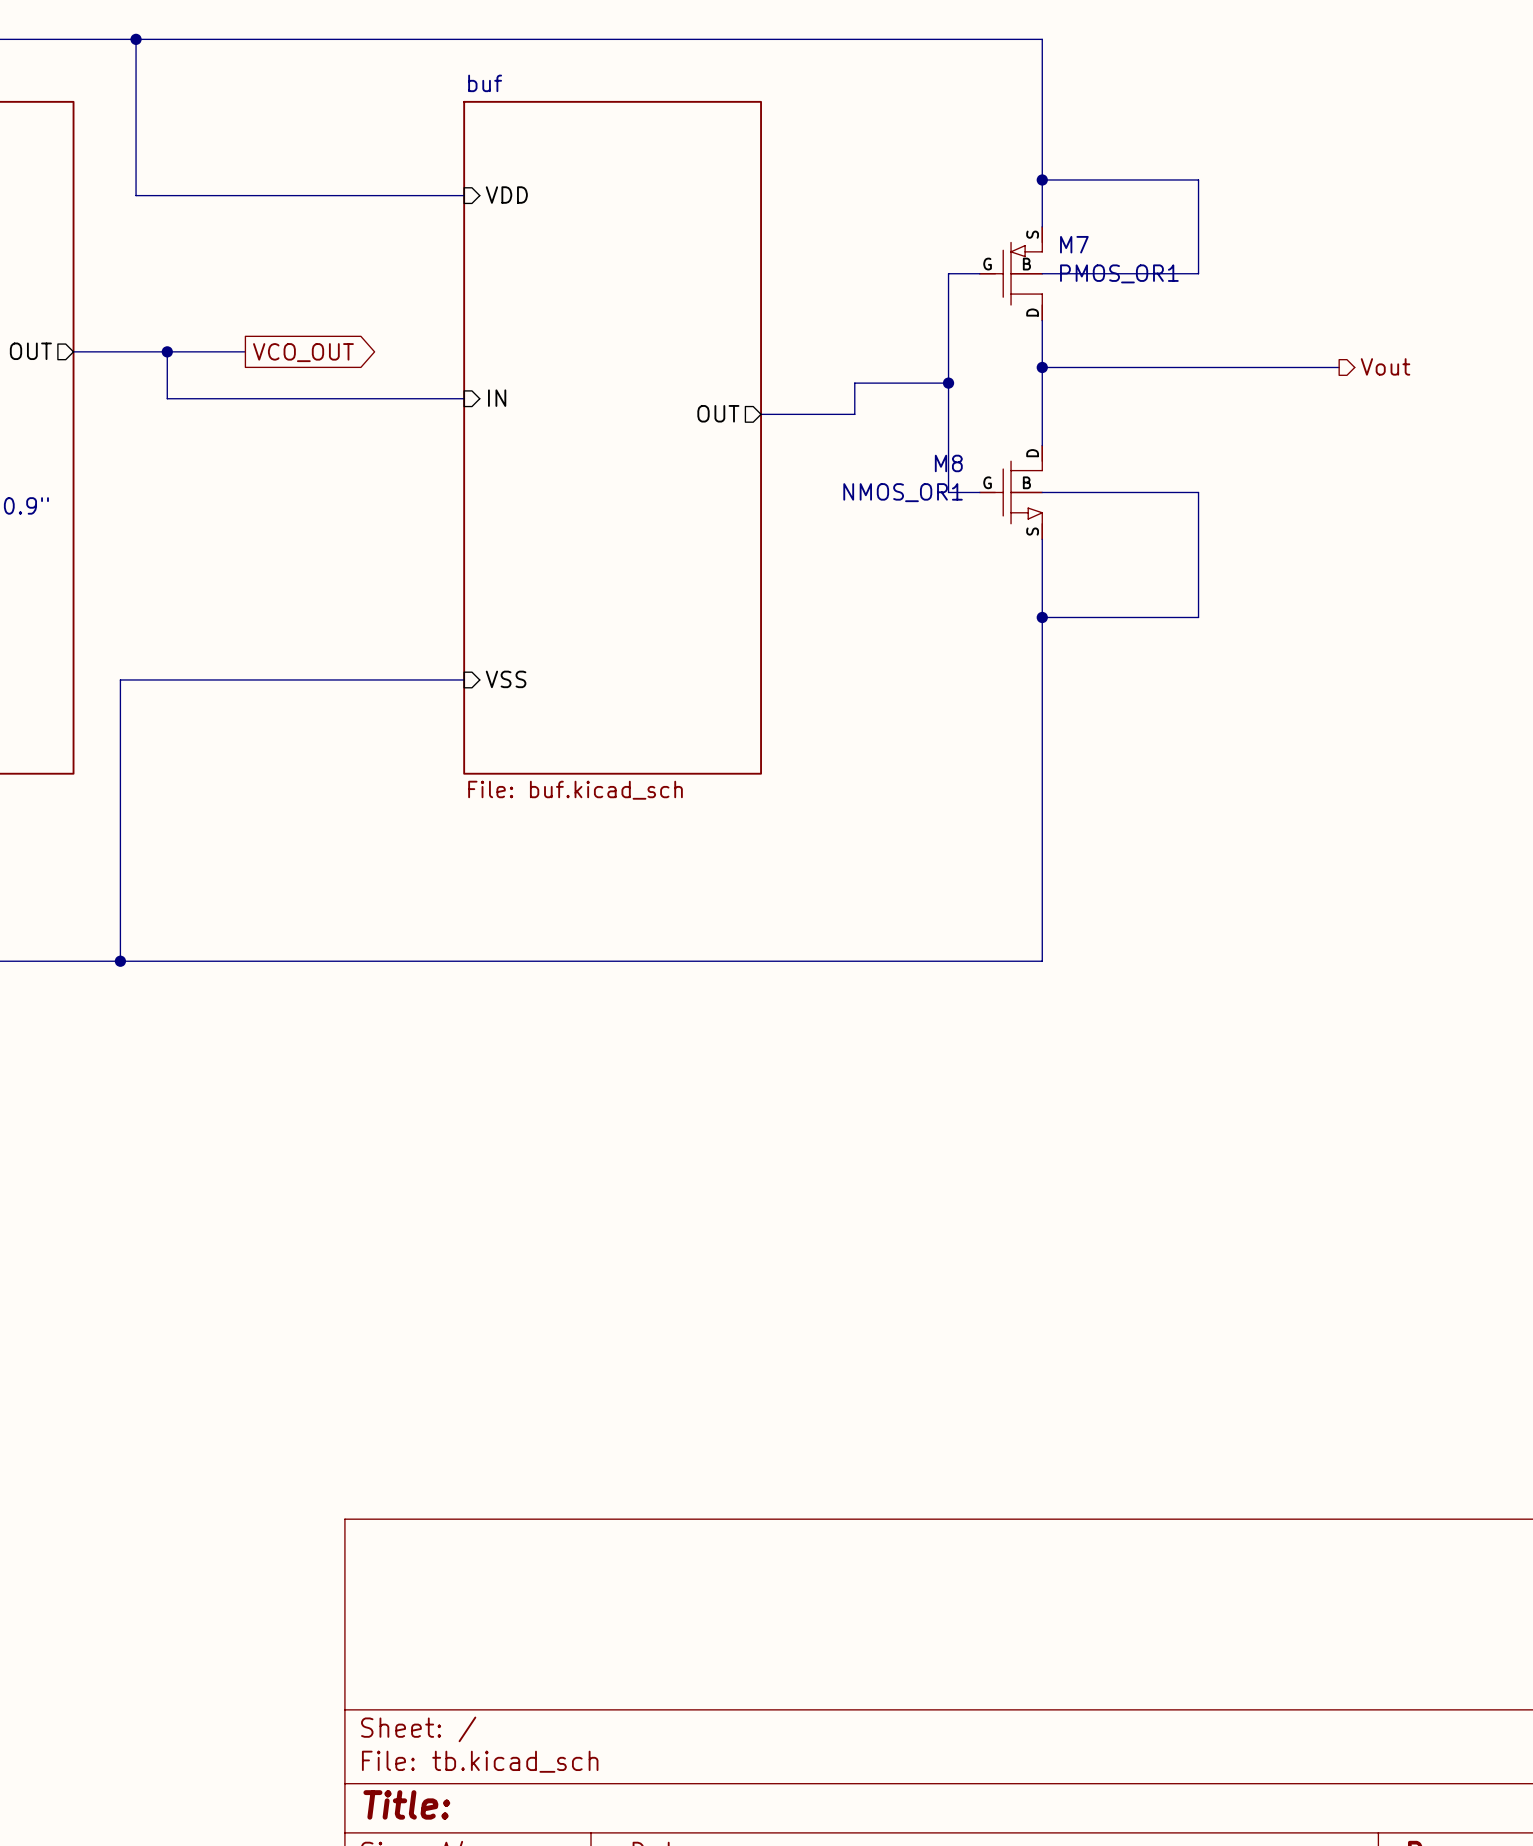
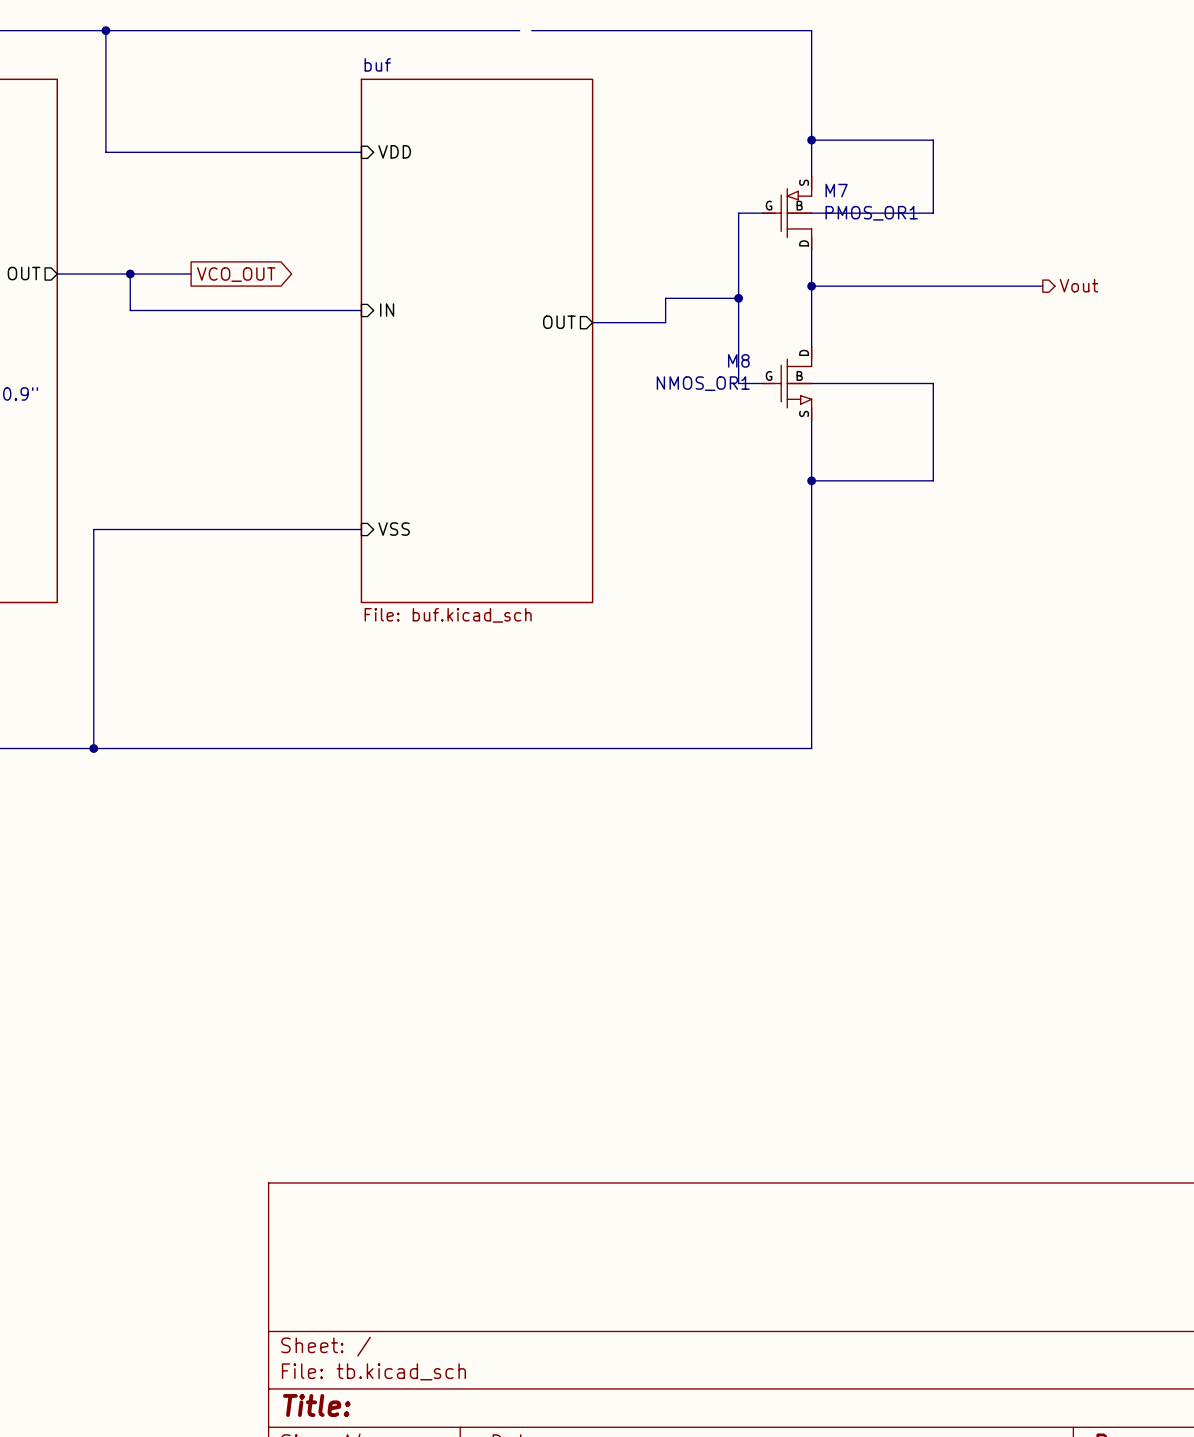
wire: (667, 39) (682, 39) -> none

